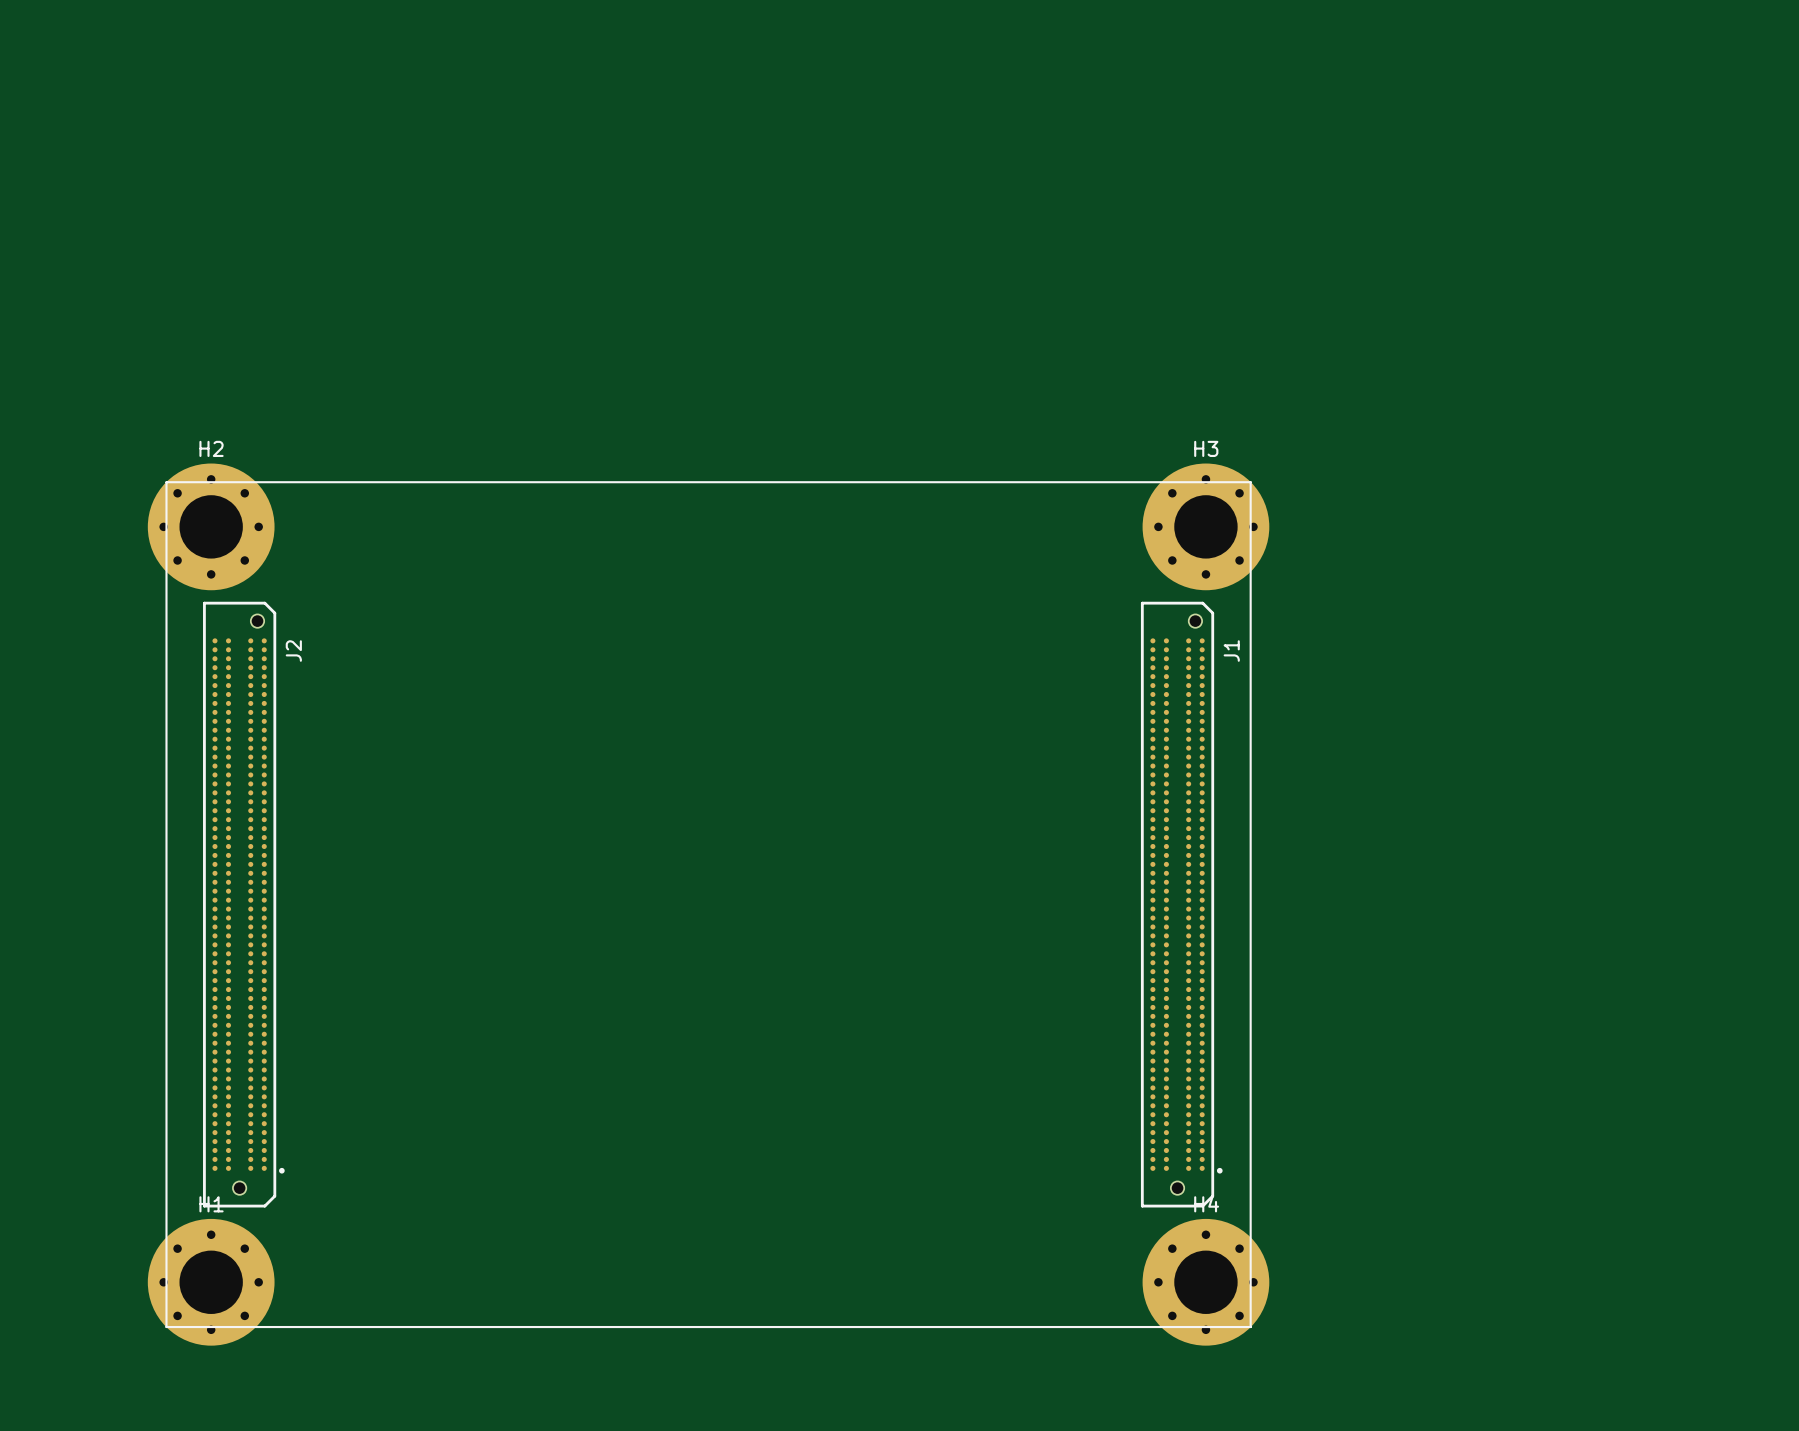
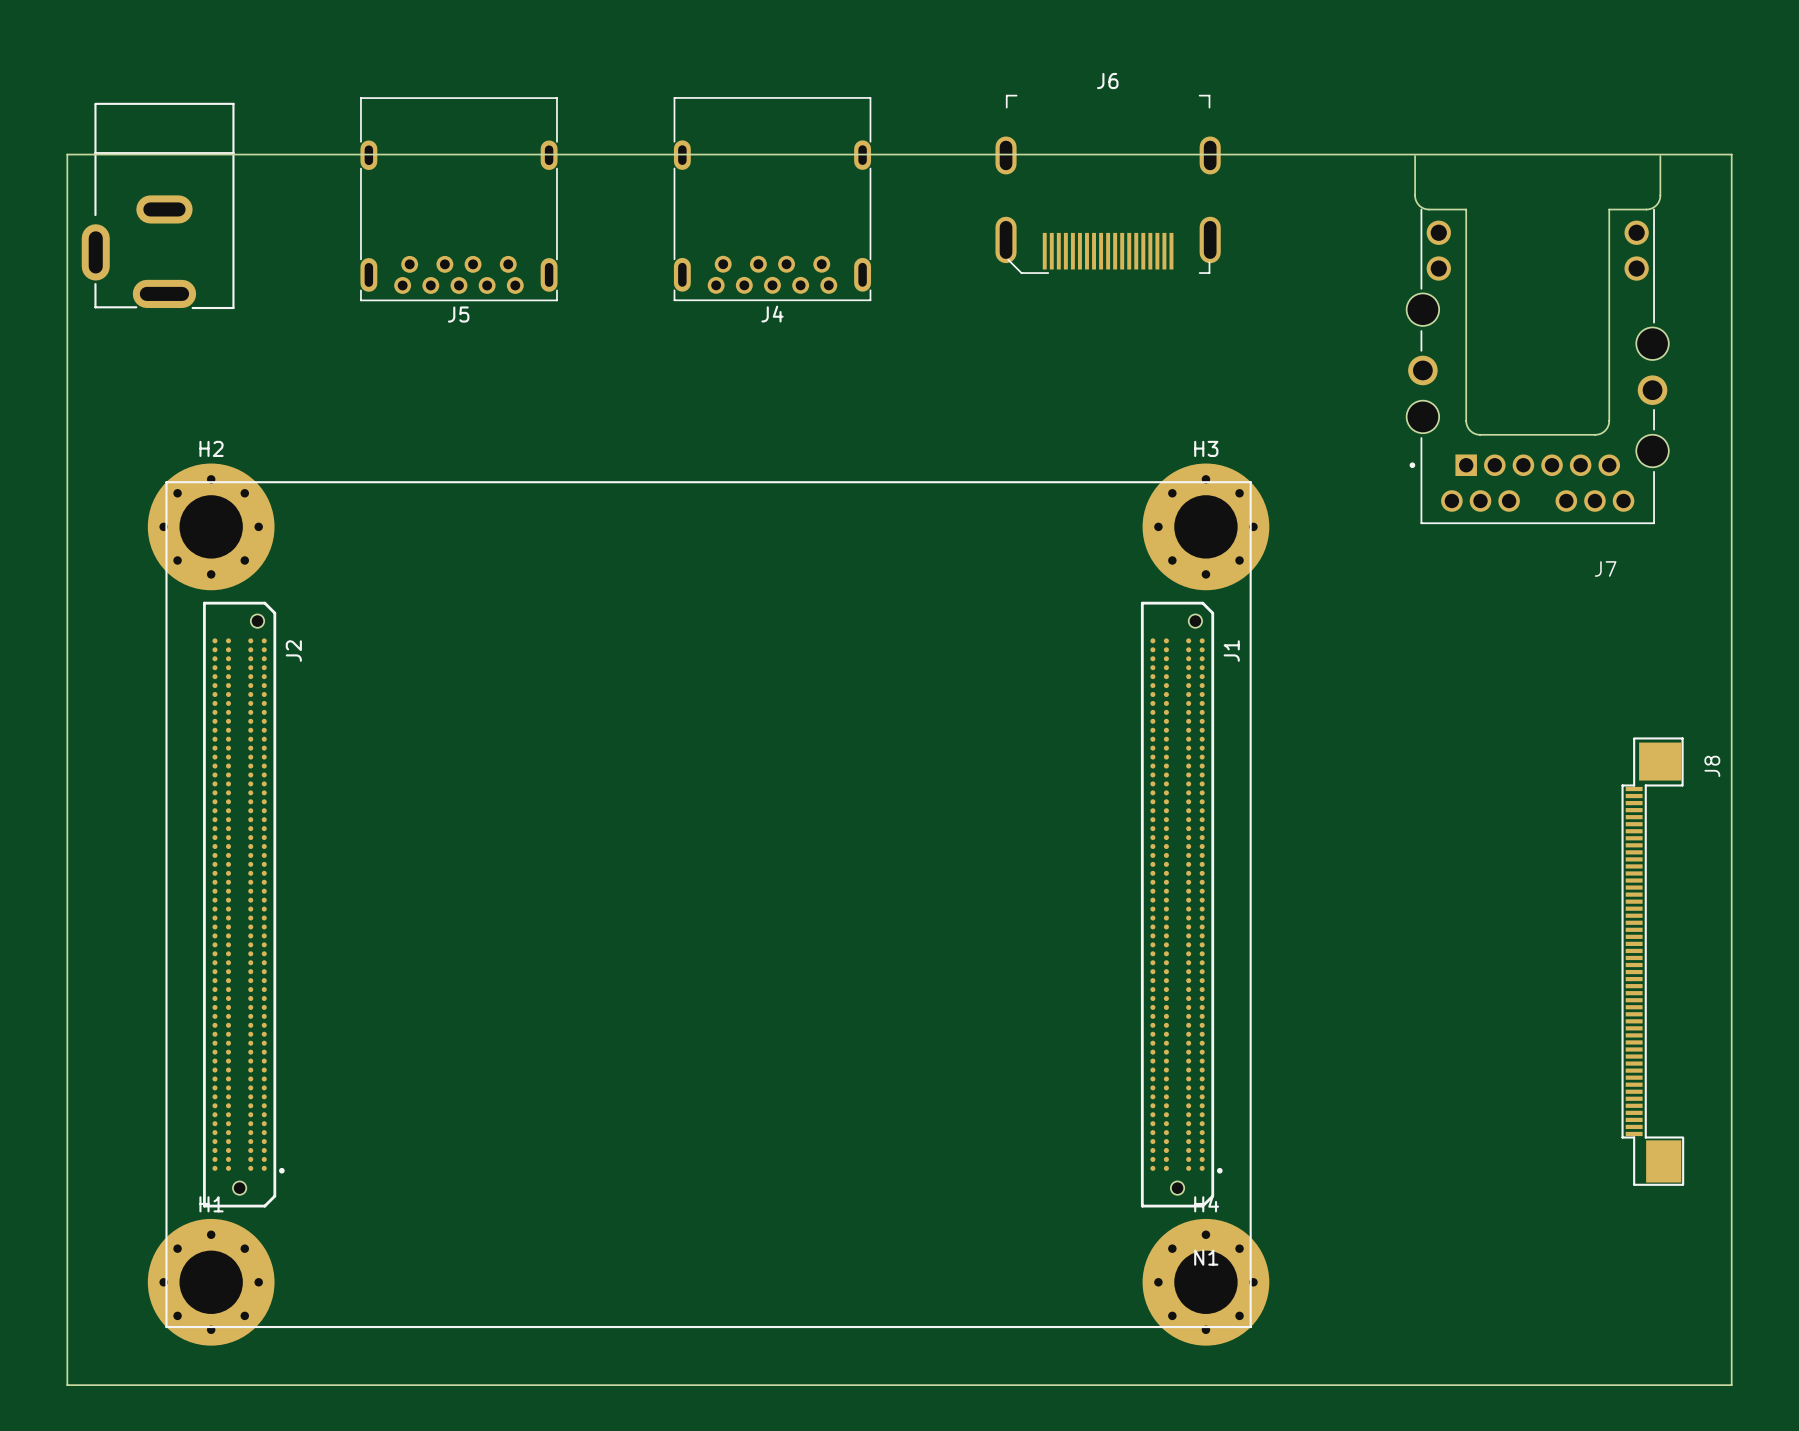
board edge: none -> (67, 154) (67, 1385) (1731, 1385) (1731, 154) (67, 154)
J6: none -> (1108, 184)
J5: none -> (458, 199)
J4: none -> (772, 199)
part: none -> (158, 205)
J7: none -> (1537, 339)
J8: none -> (1652, 961)
N1: none -> (1205, 1282)

